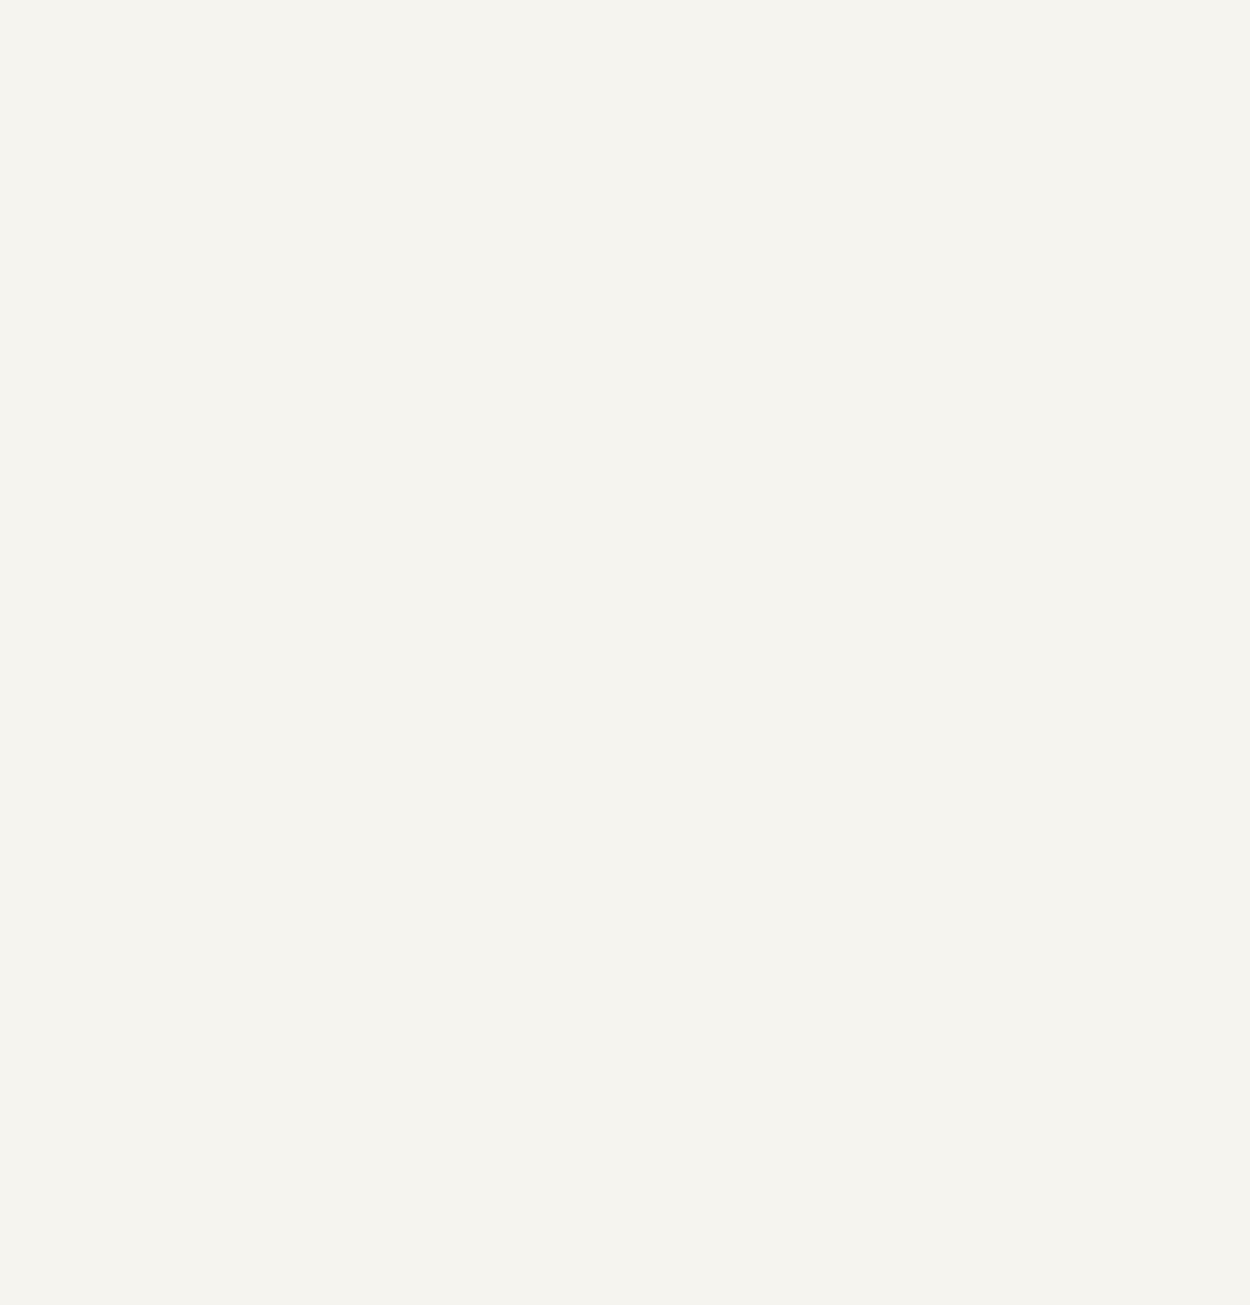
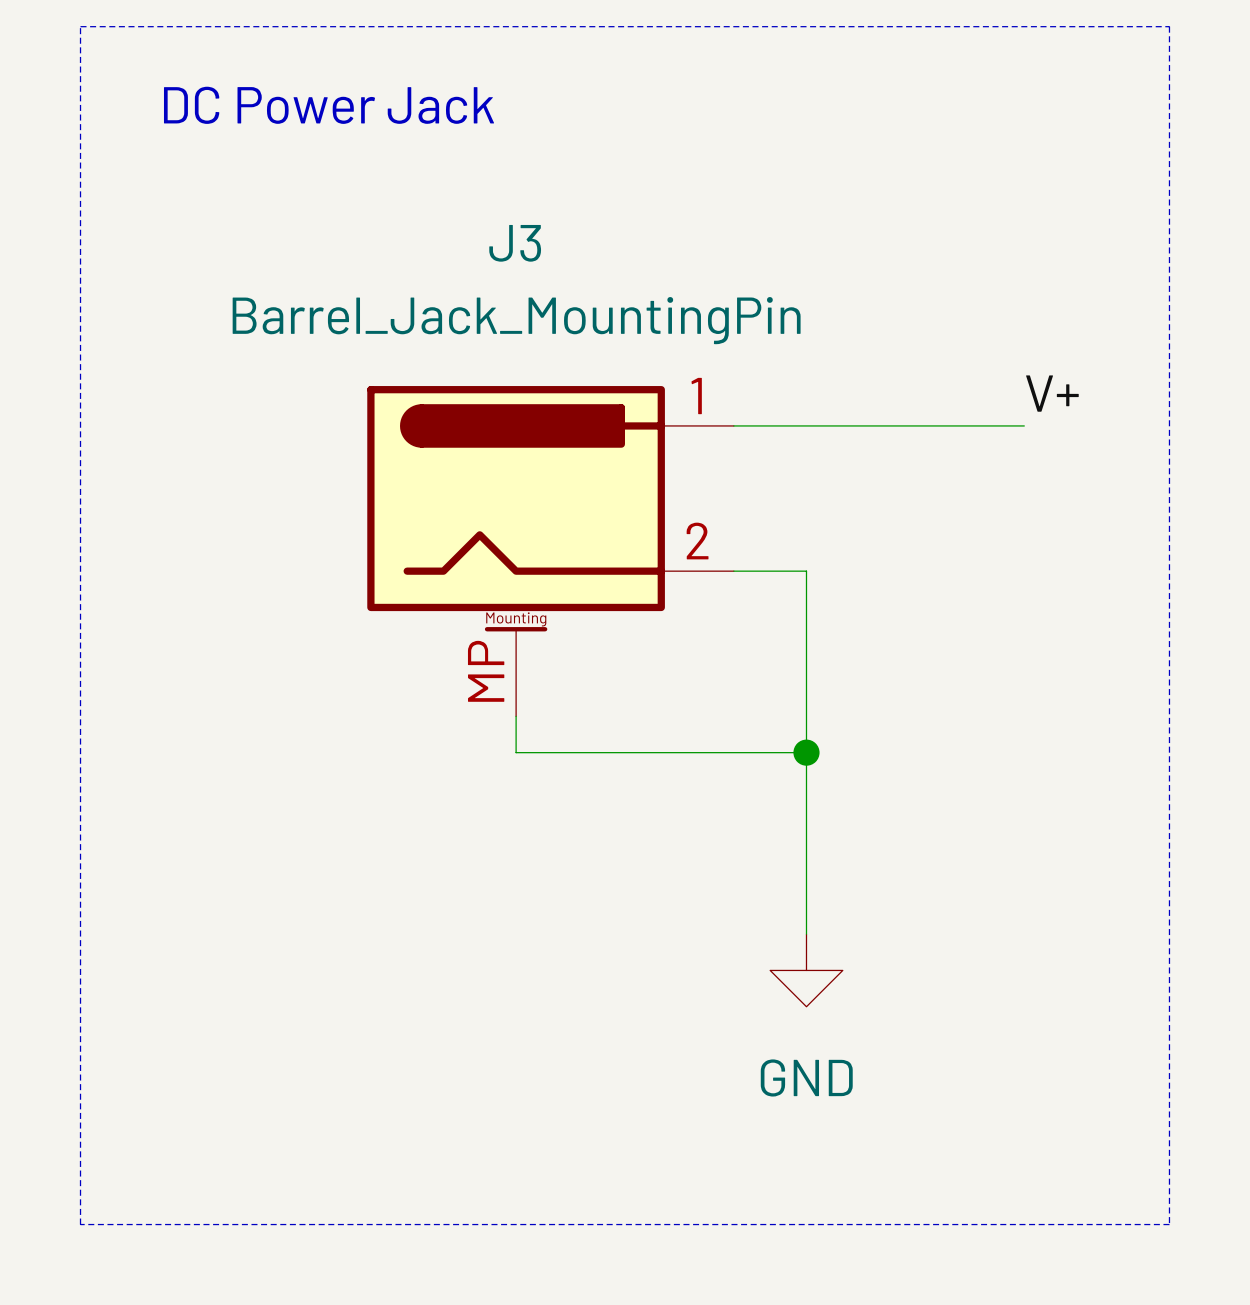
line: none -> (80, 26) (1169, 26) (1169, 1224) (80, 1224) (80, 26)
text: none -> DC Power Jack (329, 105)
label: none -> V+ (1052, 393)
wire: none -> (733, 425) (1024, 425)
J3: none -> Barrel_Jack_MountingPin (550, 551)
wire: none -> (733, 571) (806, 571) (806, 934)
wire: none -> (516, 716) (516, 752) (806, 752)
junction: none -> (806, 752)
power symbol: none -> GND (806, 970)

